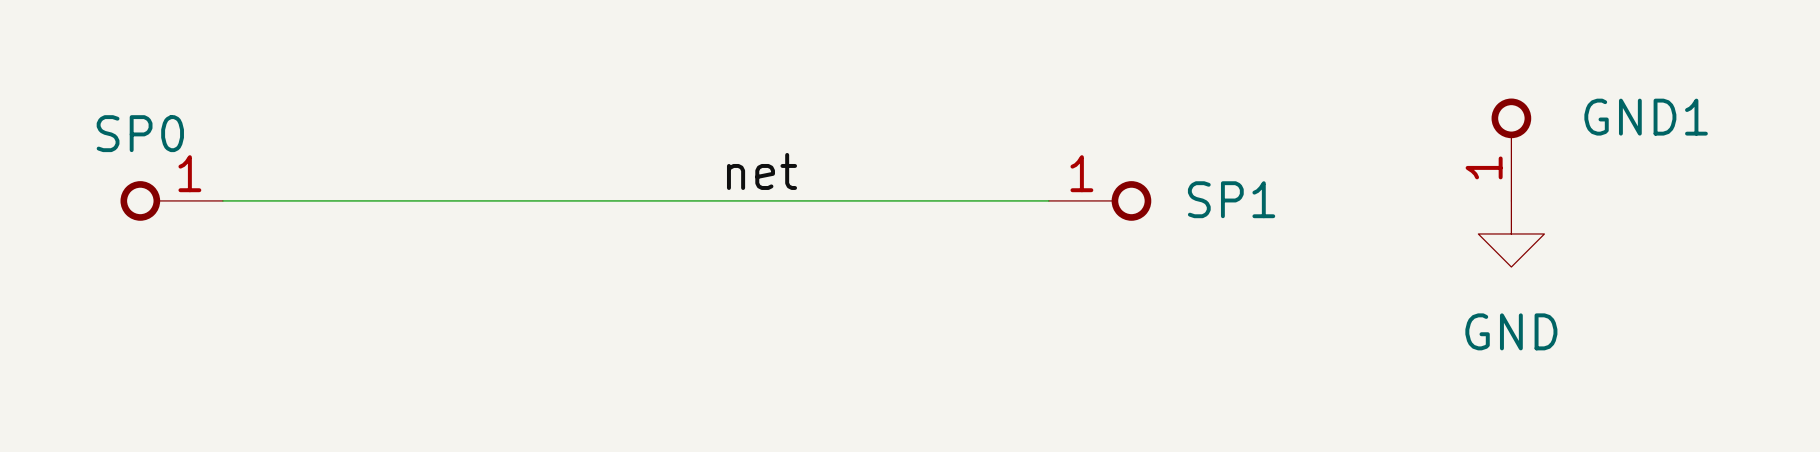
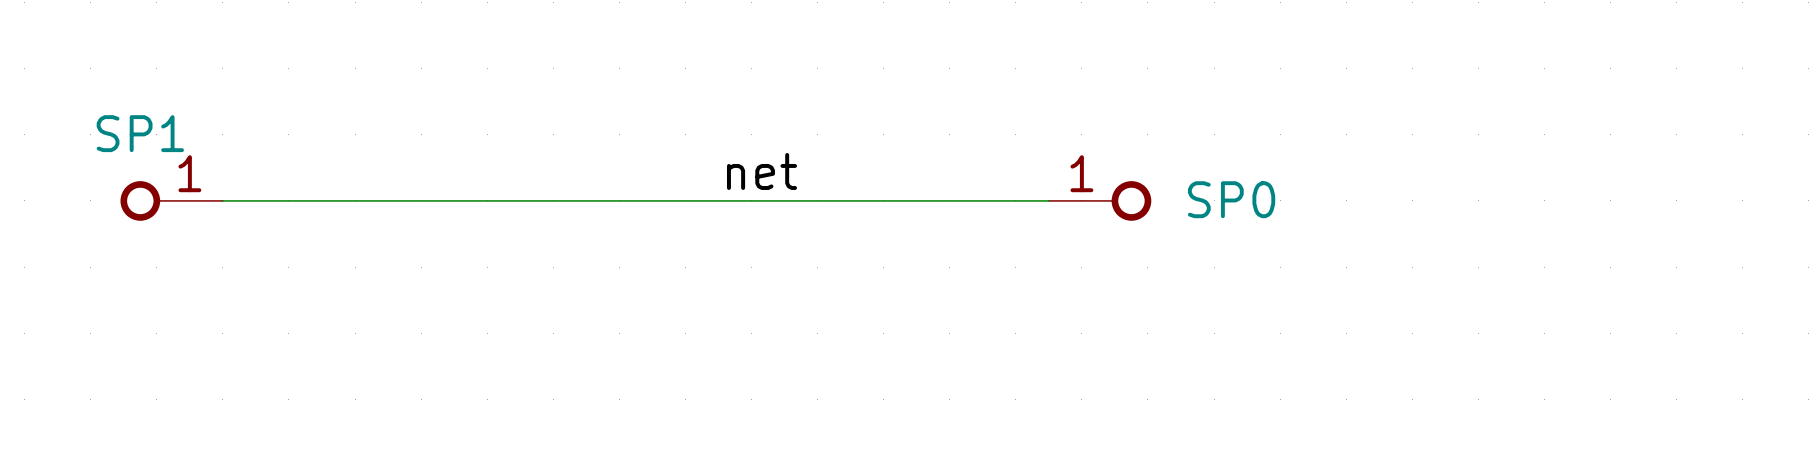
SP0 name: SP0 (140, 133) -> SP1 (140, 133)
GND1: (1511, 149) -> none
SP1 name: SP1 (1231, 199) -> SP0 (1231, 199)
power symbol: GND (1511, 233) -> none

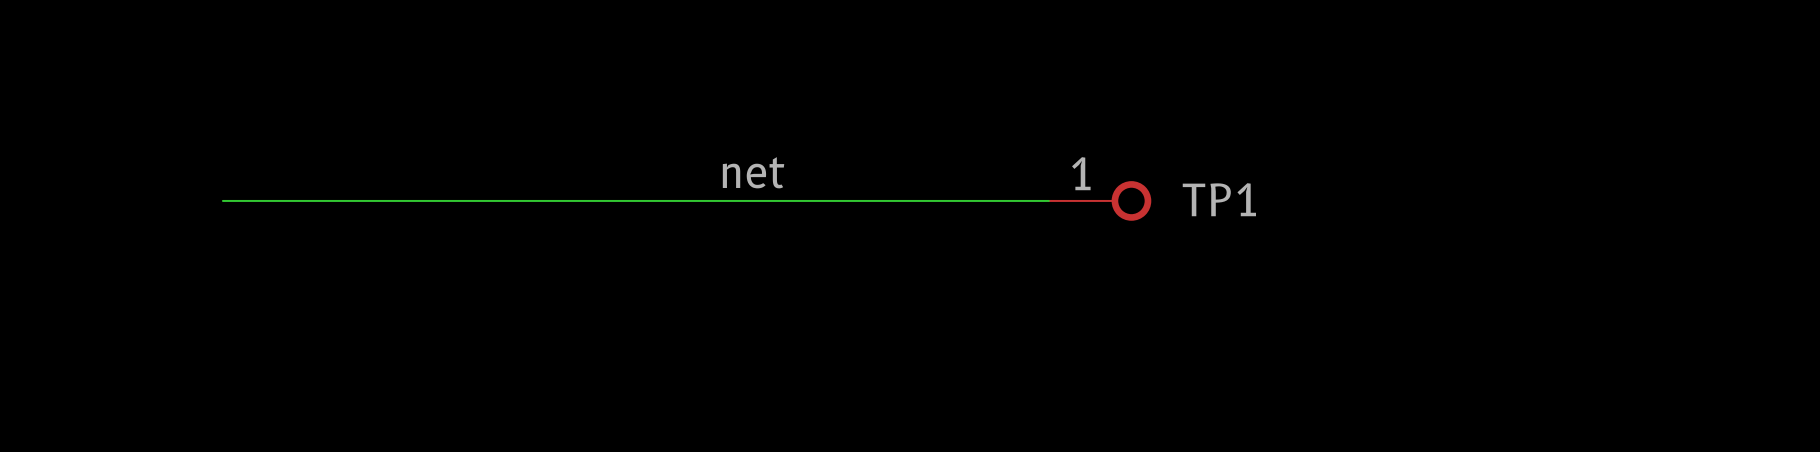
SP0 name: SP0 (1231, 199) -> TP1 (1219, 199)
SP1: (171, 200) -> none

